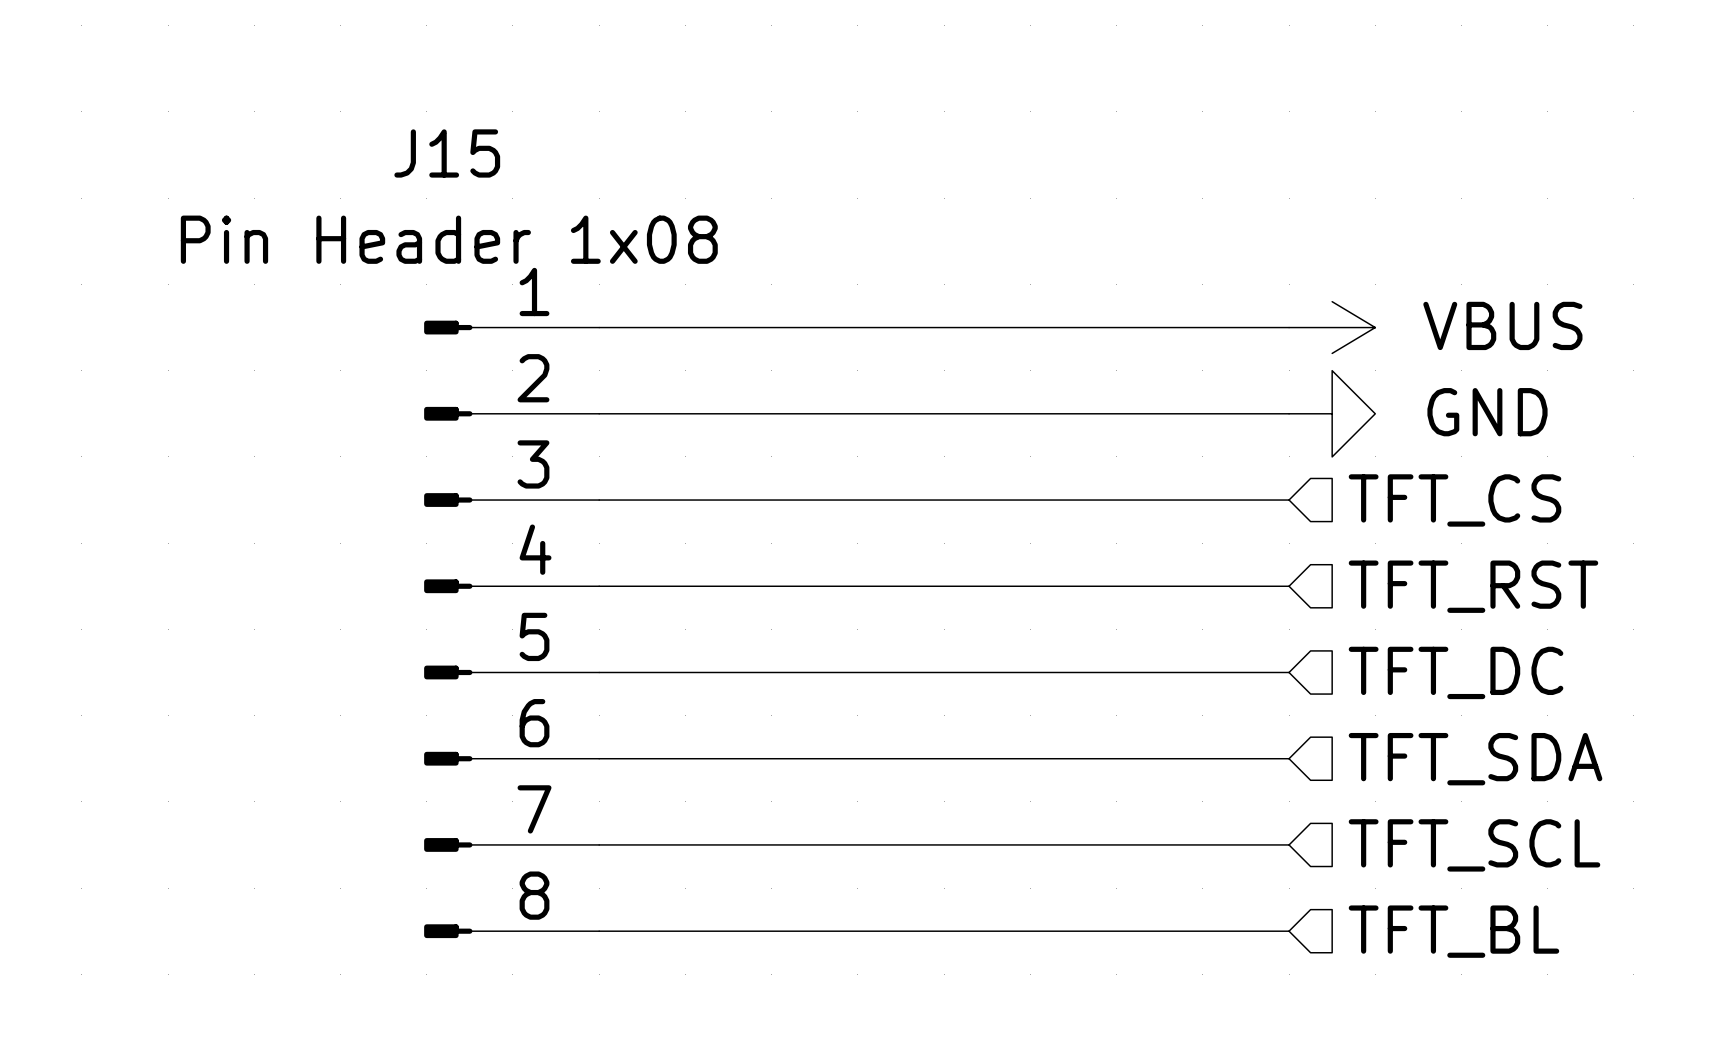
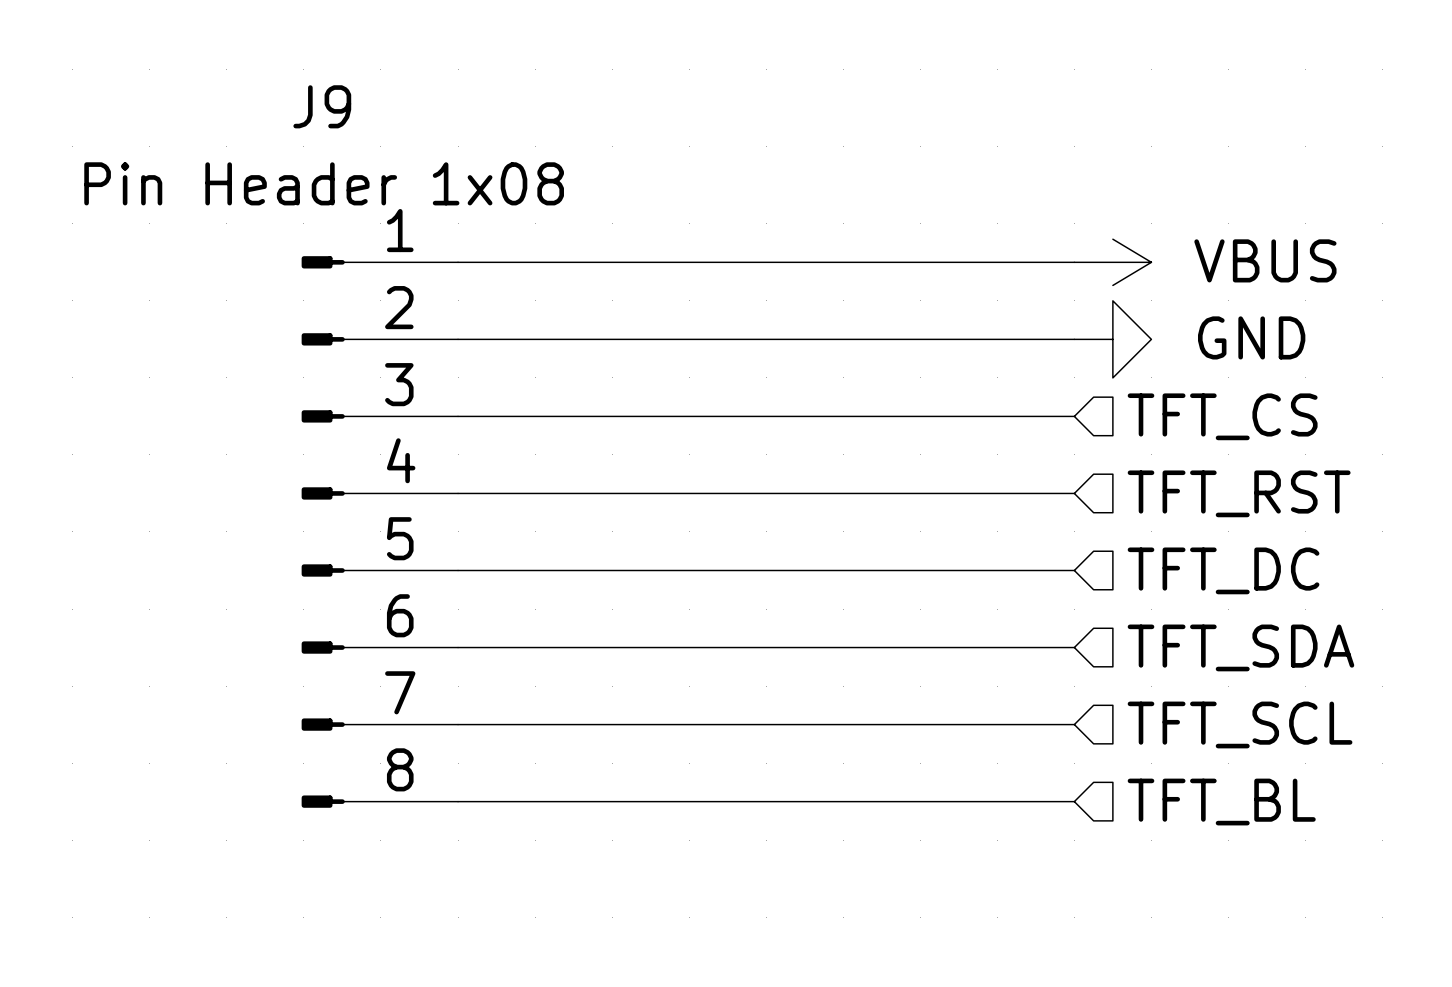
J15 name: J15 (447, 153) -> J9 (322, 106)

